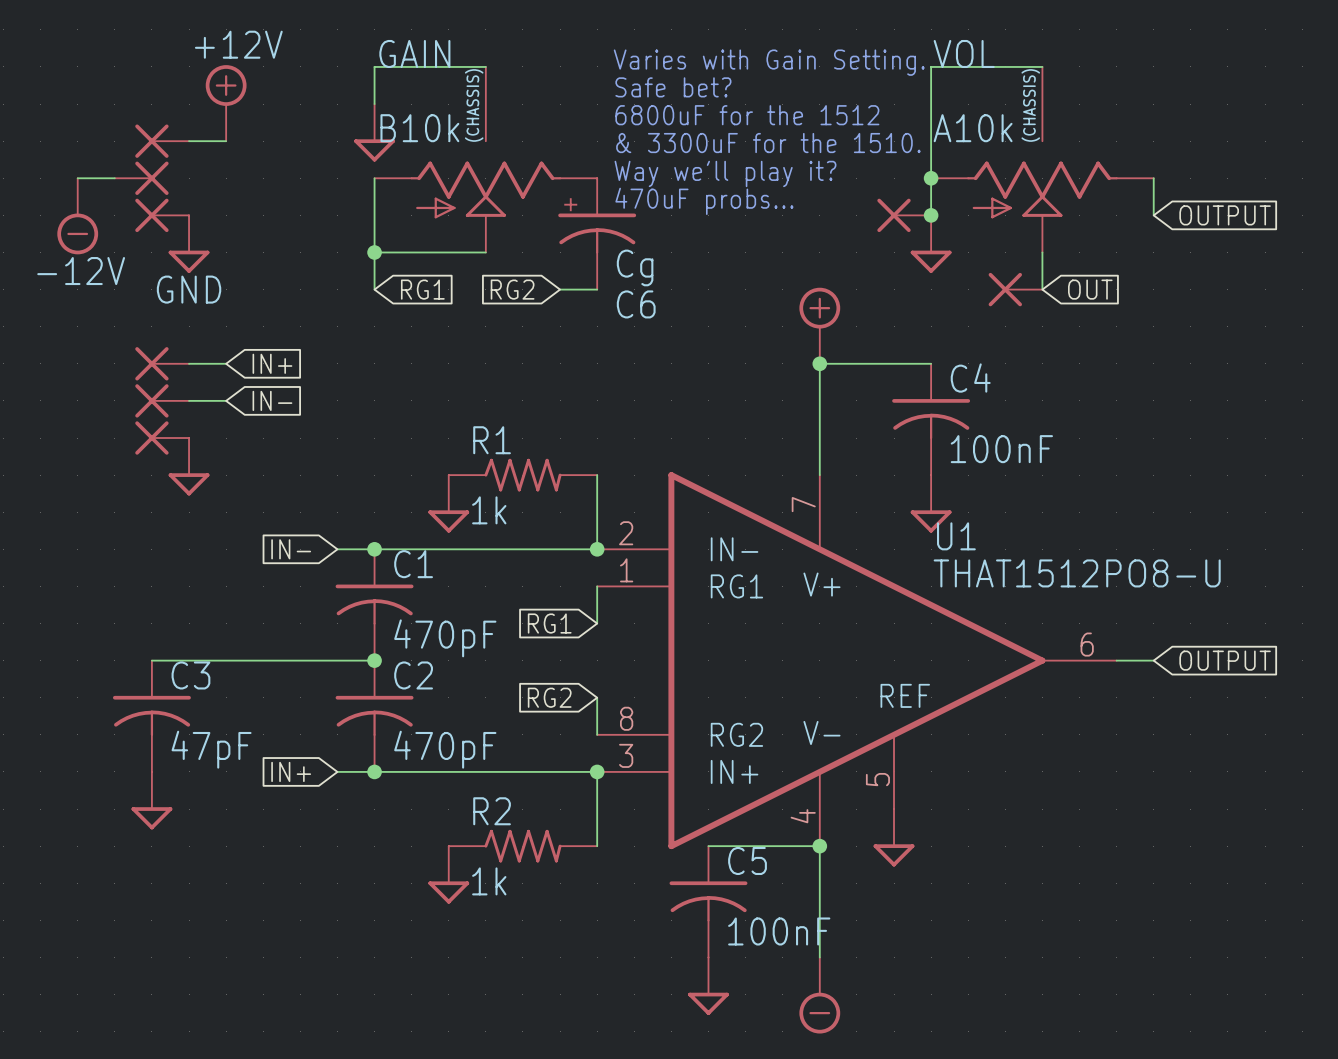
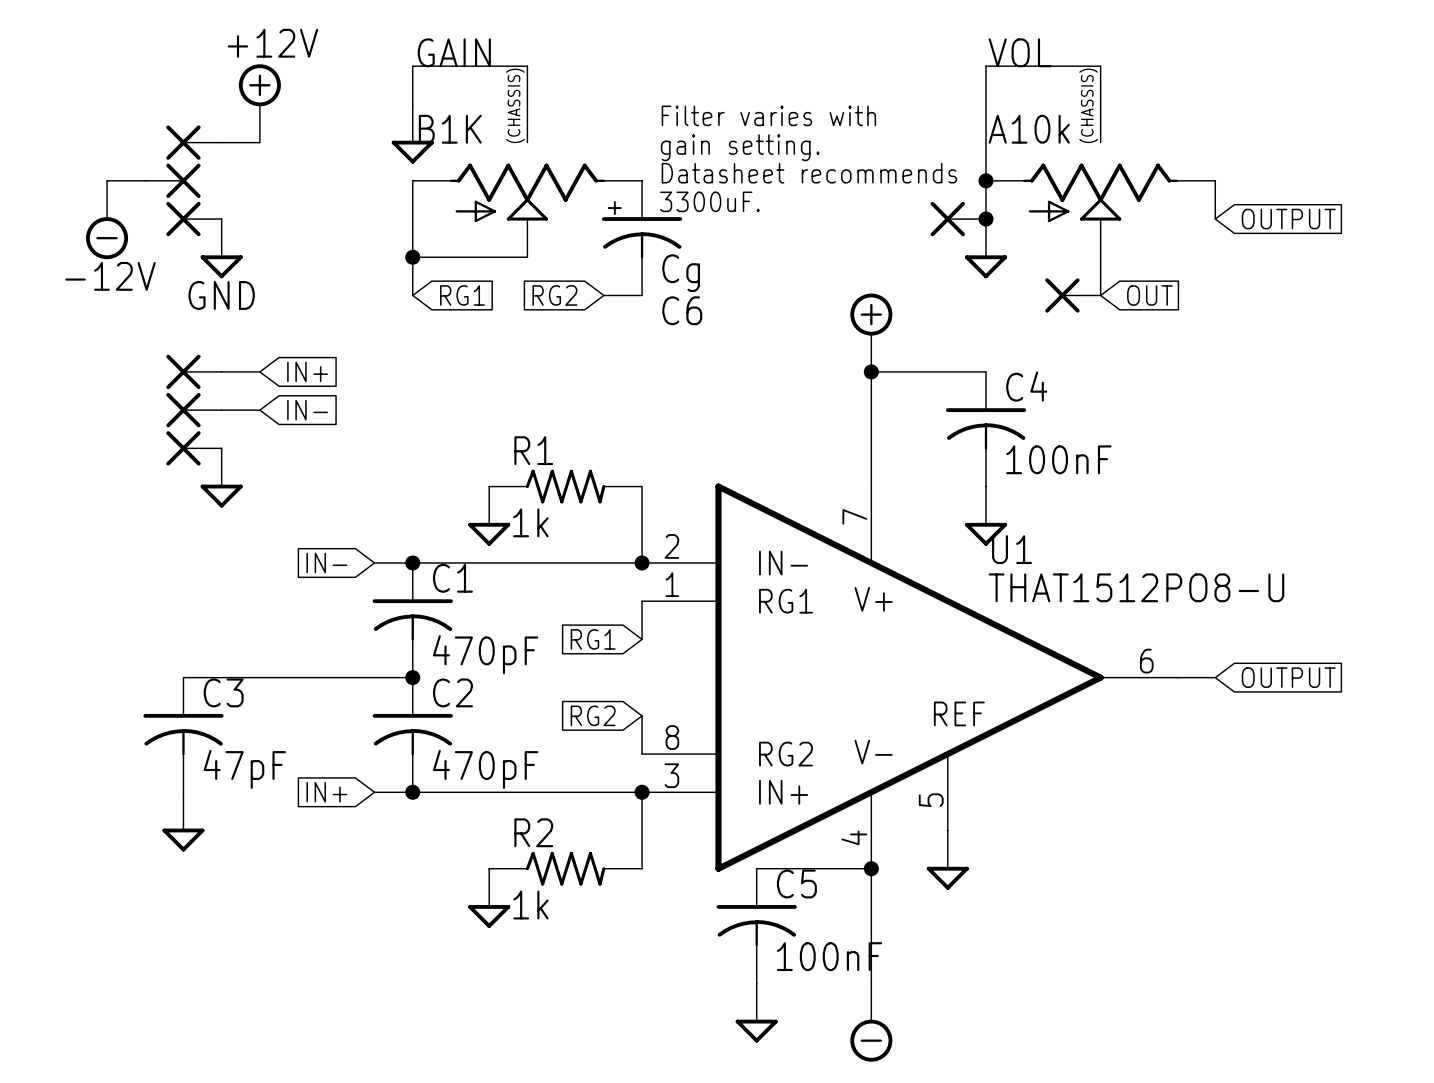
text: Varies with Gain Setting. (769, 62) -> none
text: Safe bet? (673, 87) -> none
text: 6800uF for the 1512 (747, 115) -> Filter varies with (768, 115)
GAIN value: B10k (419, 128) -> B1K (450, 129)
text: & 3300uF for the 1510. (768, 143) -> gain setting. (740, 147)
text: Way we'll play it? (725, 173) -> Datasheet recommends (809, 173)
text: 470uF probs... (704, 201) -> 3300uF. (709, 201)

